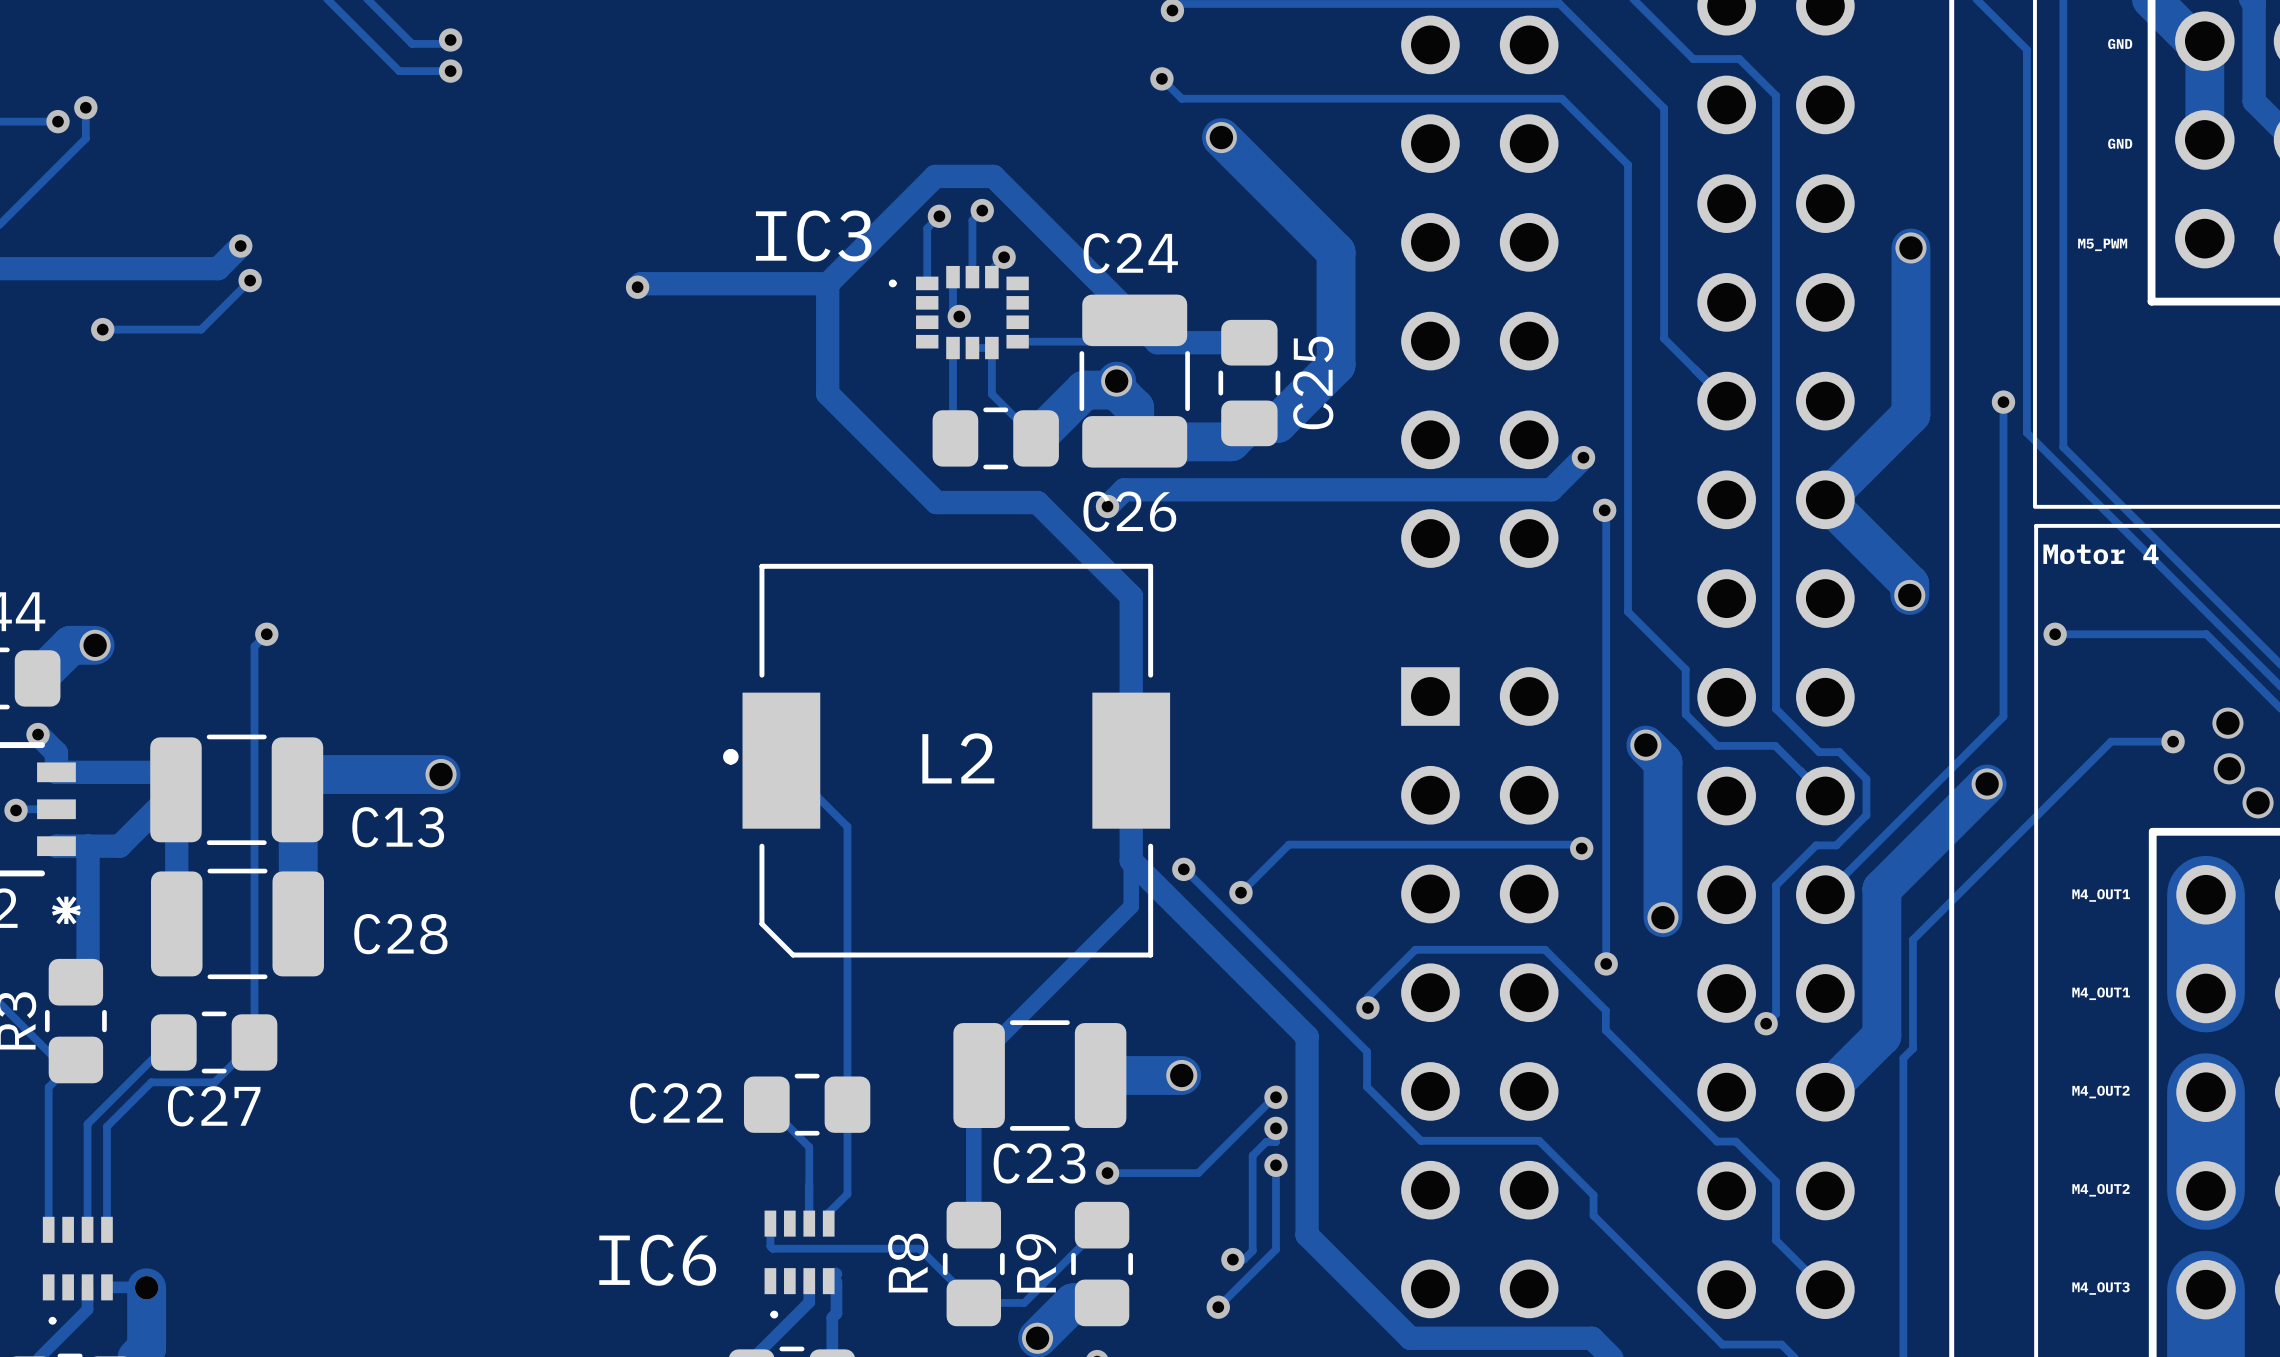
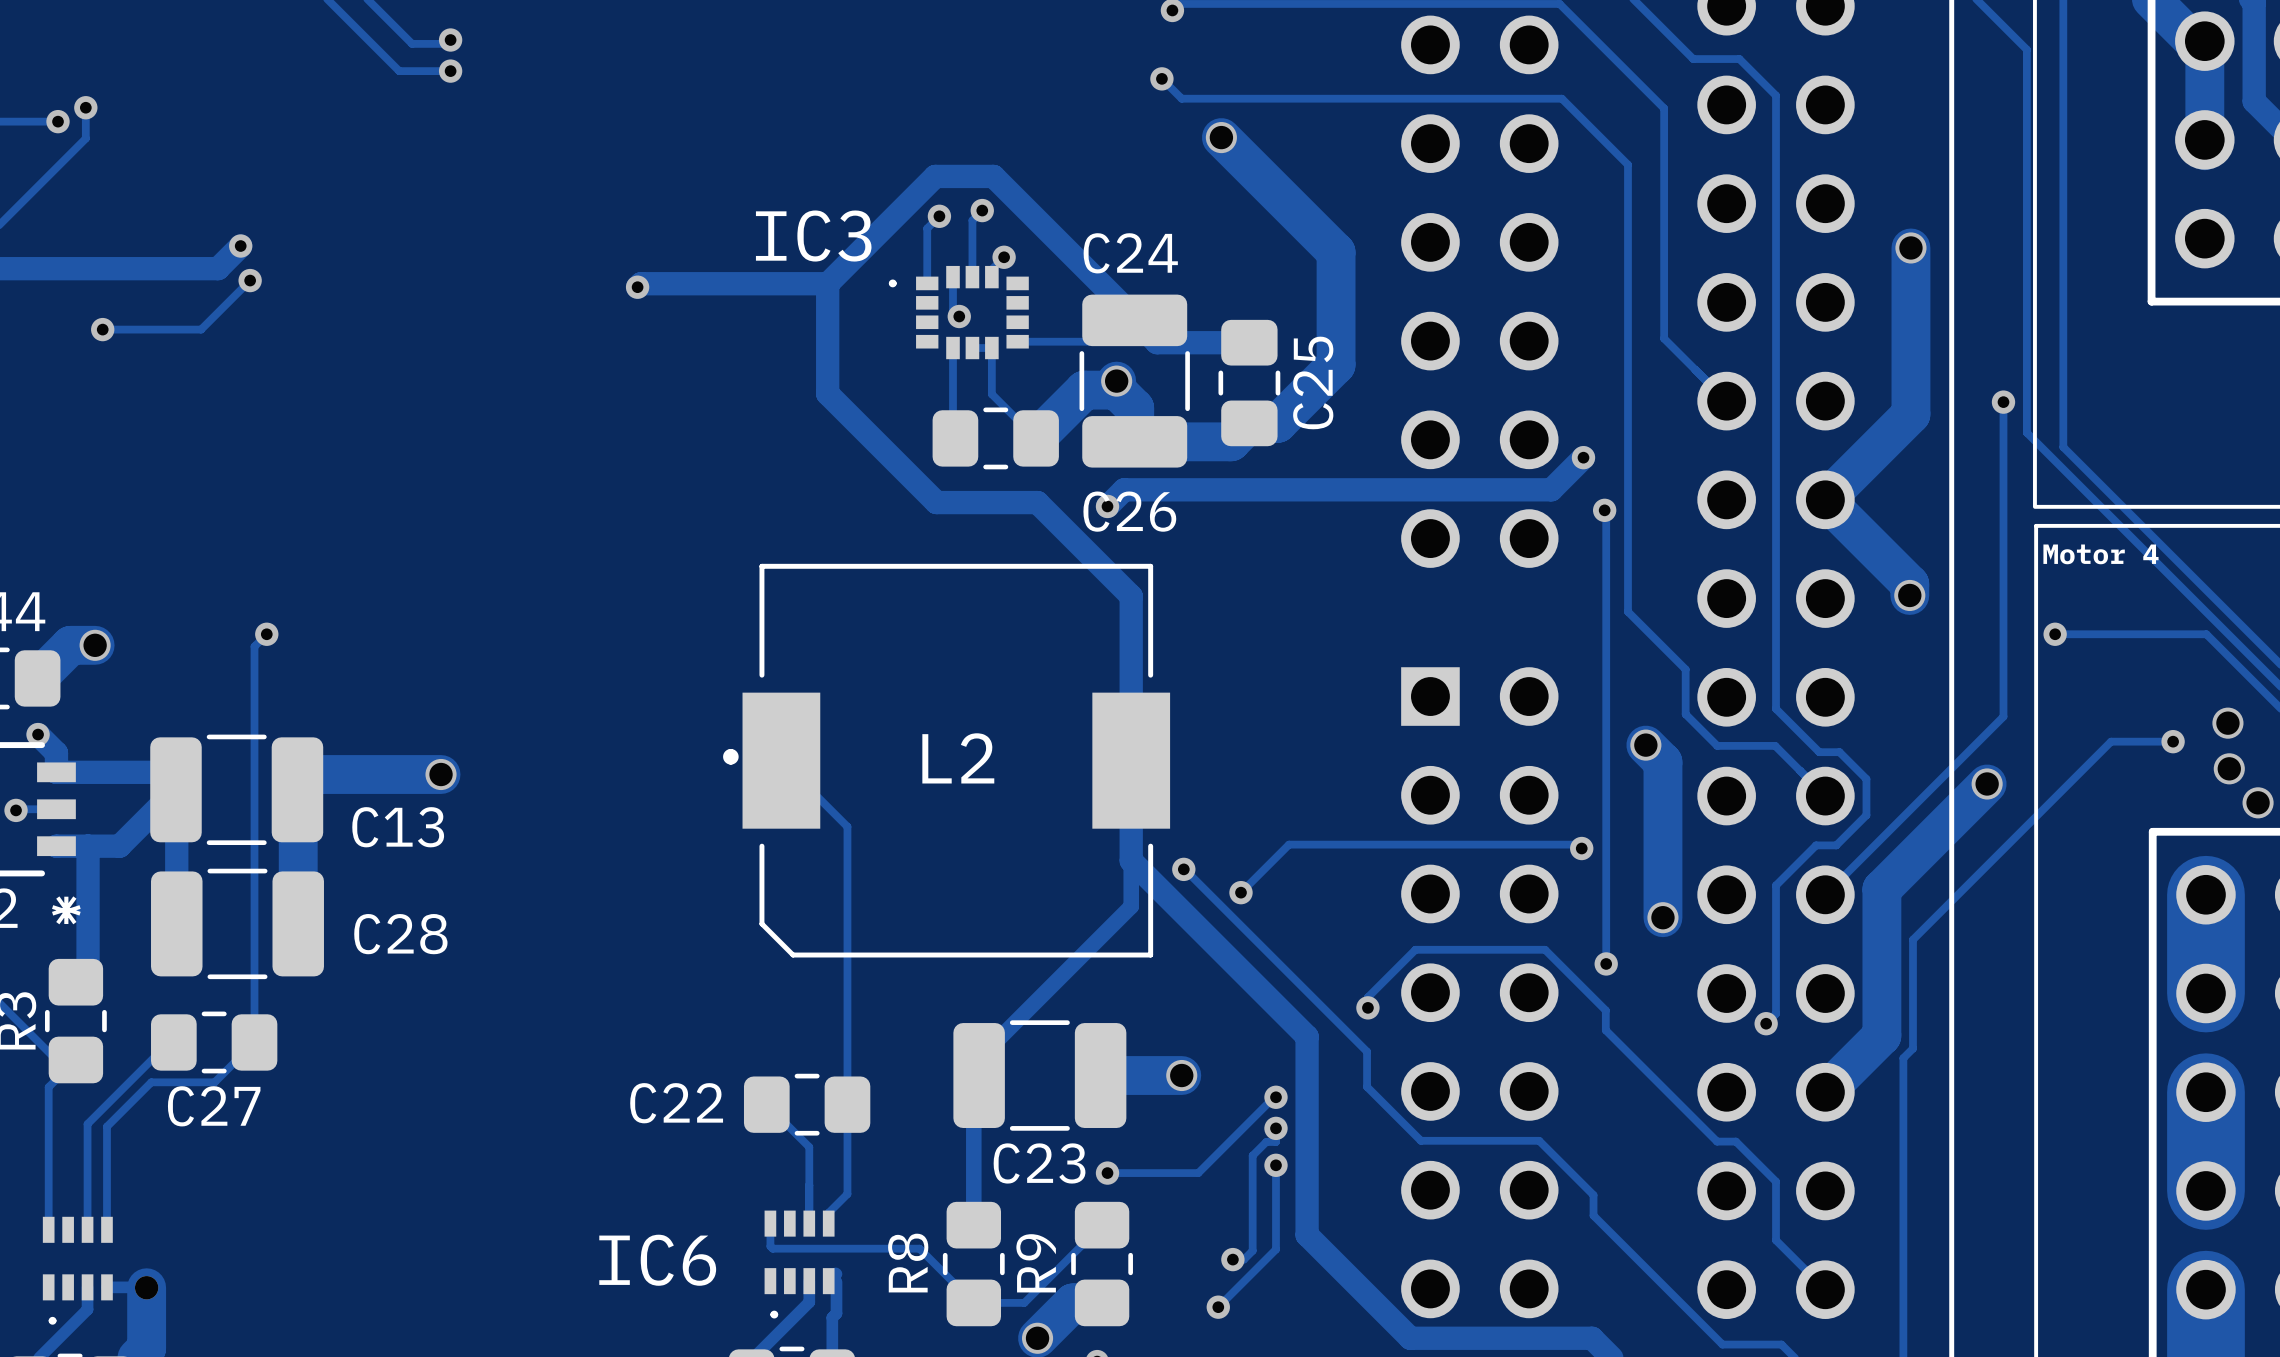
text: GND (2120, 43) -> none
text: GND (2120, 143) -> none
text: M5_PWM (2102, 244) -> none
text: M4_OUT1 (2101, 895) -> none
text: M4_OUT1 (2101, 993) -> none
text: M4_OUT2 (2101, 1092) -> none
text: M4_OUT2 (2101, 1190) -> none
text: M4_OUT3 (2101, 1288) -> none

